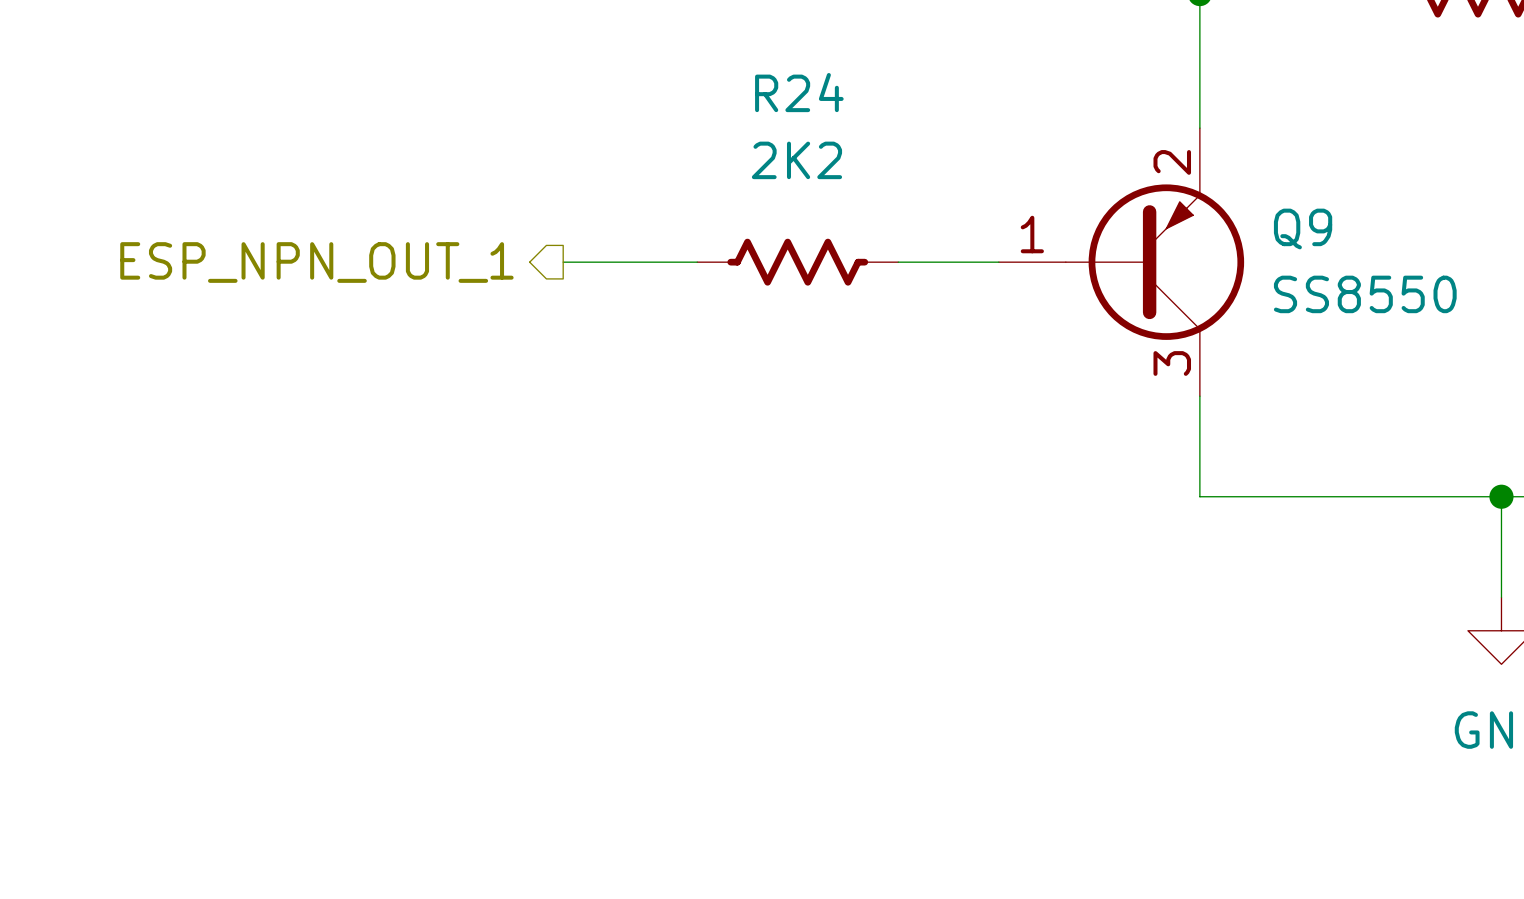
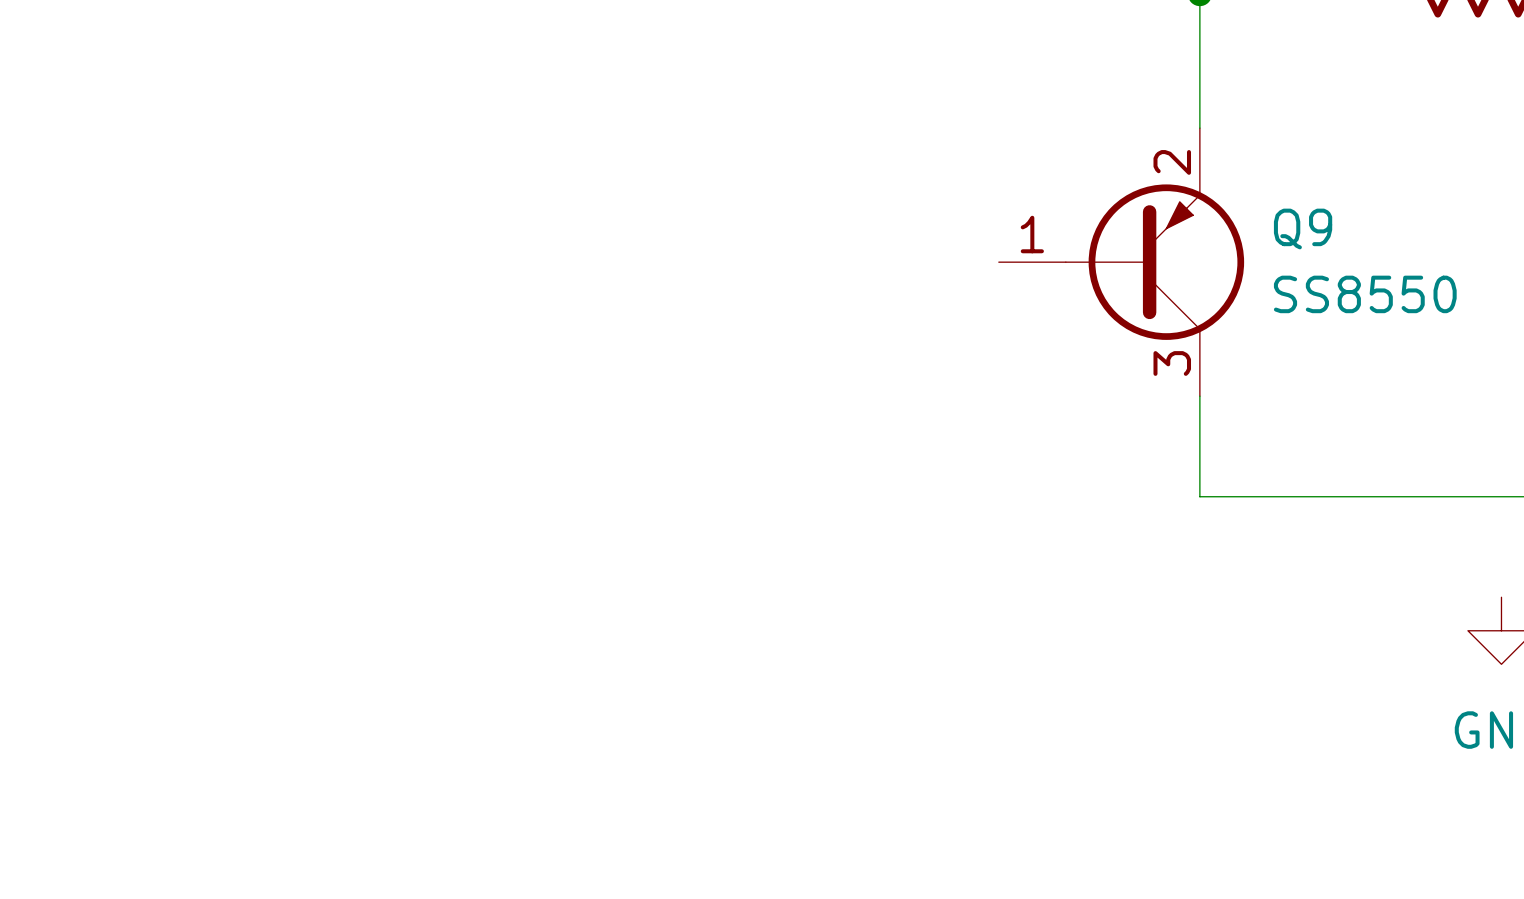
hierarchical label: ESP_NPN_OUT_1 (316, 262) -> none
wire: (563, 262) (697, 262) -> none
R24: 2K2 (797, 262) -> none
wire: (898, 262) (998, 262) -> none
wire: (1501, 496) (1501, 597) -> none
junction: (1501, 496) -> none

